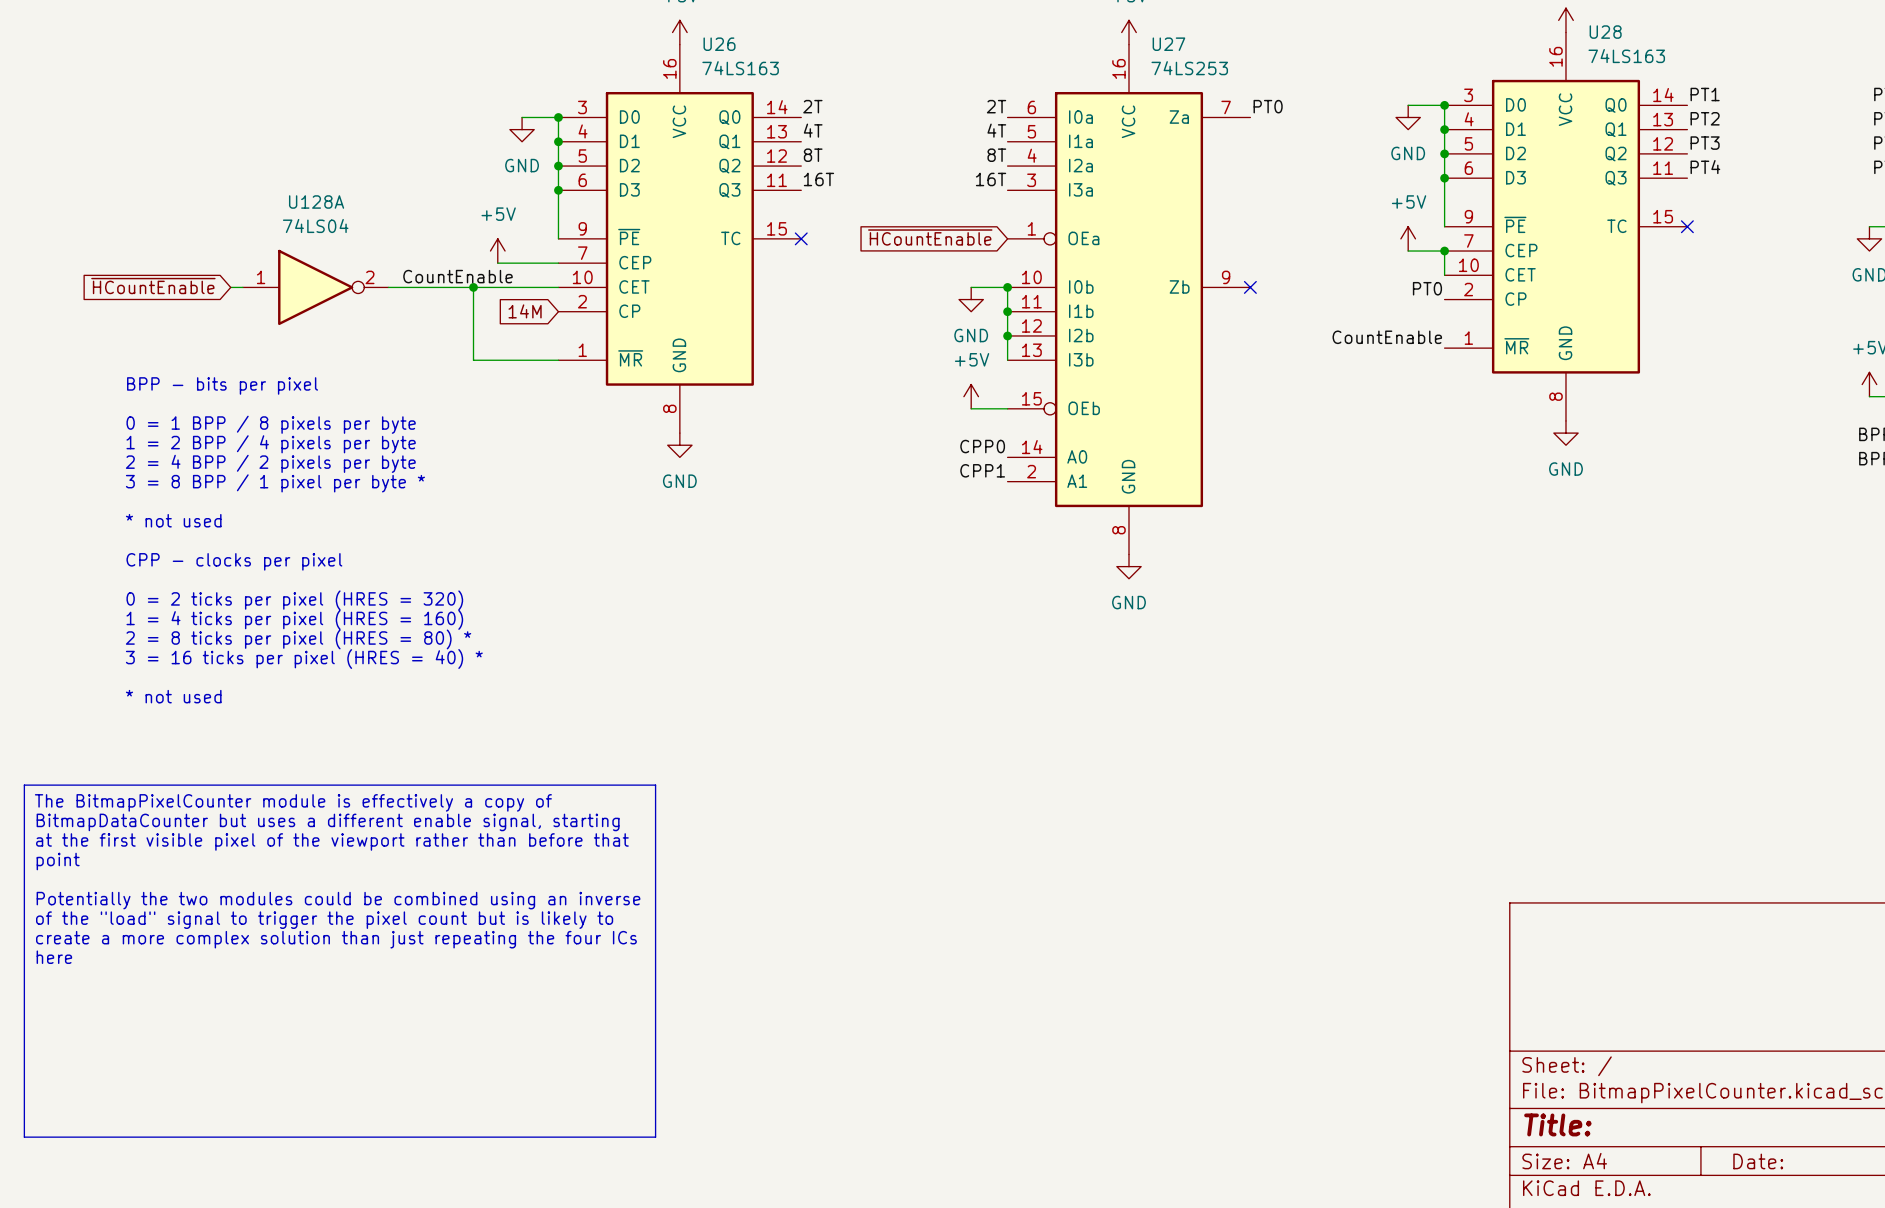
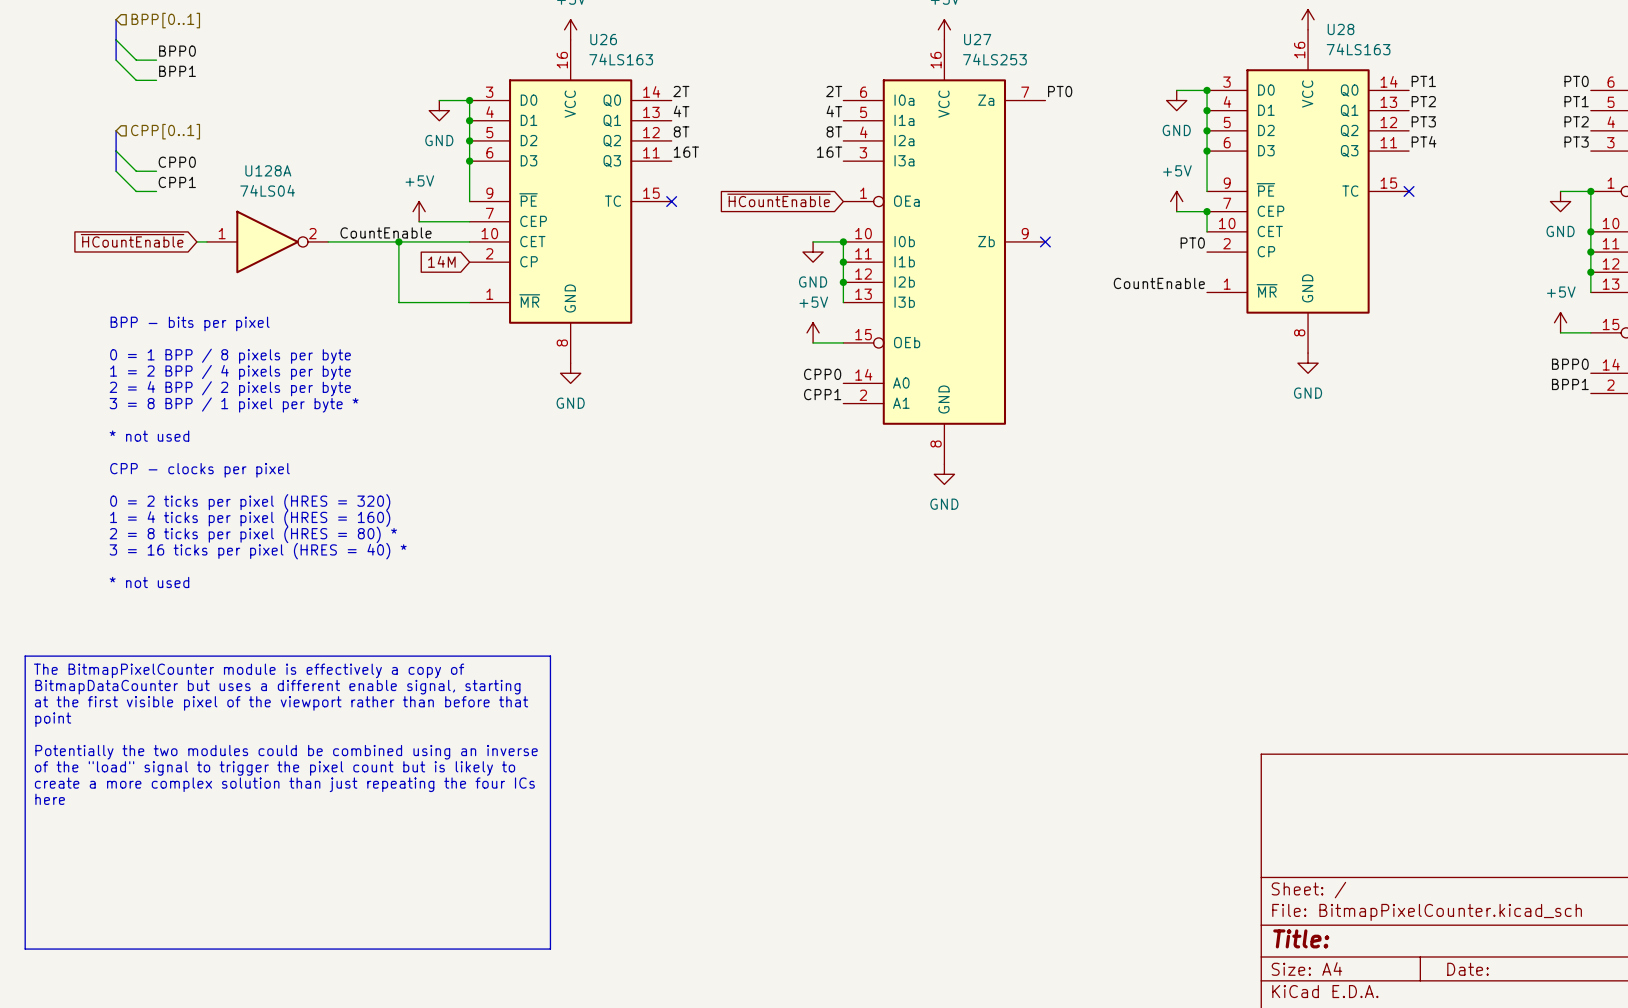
bus: none -> (116, 19) (116, 60)
hierarchical label: none -> BPP[0..1] (165, 20)
wire: none -> (116, 39) (136, 60) (156, 60)
label: none -> BPP0 (177, 51)
wire: none -> (116, 60) (136, 80) (156, 80)
label: none -> BPP1 (177, 71)
bus: none -> (116, 130) (116, 171)
hierarchical label: none -> CPP[0..1] (165, 131)
wire: none -> (116, 151) (136, 171) (156, 171)
label: none -> CPP0 (177, 162)
wire: none -> (116, 171) (136, 191) (156, 191)
label: none -> CPP1 (177, 182)

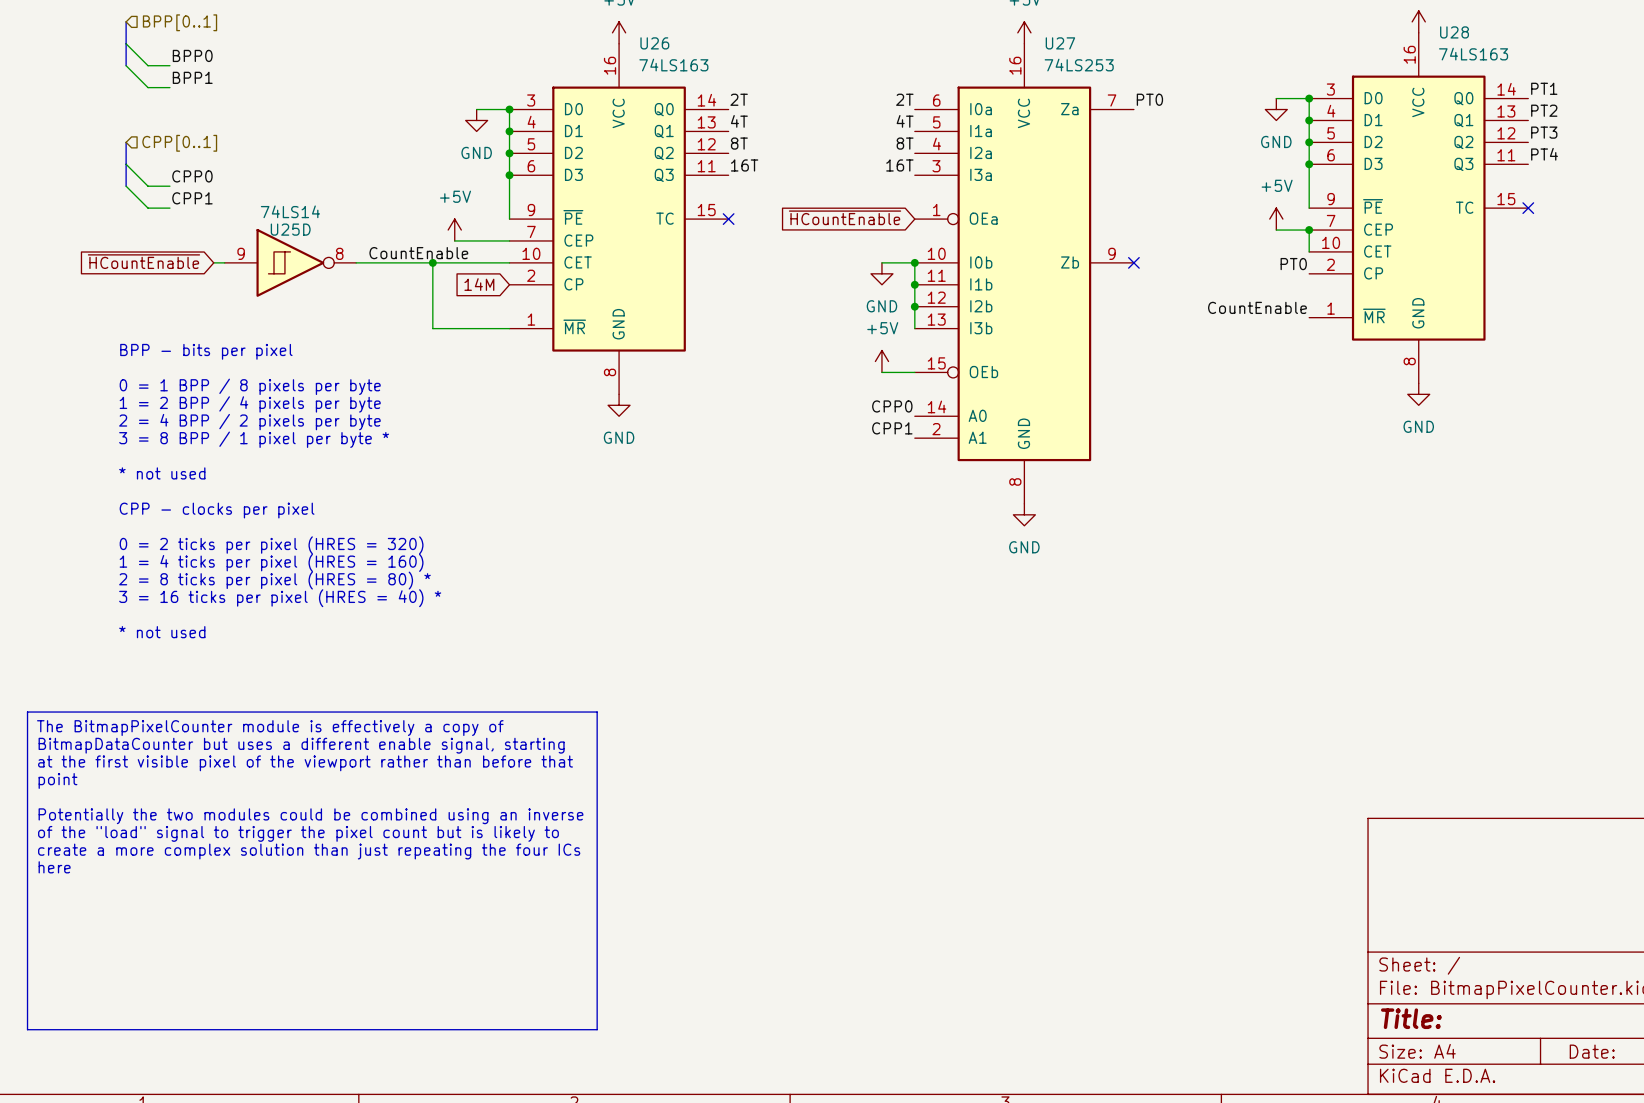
U128A: 74LS04 (267, 241) -> none
U25D: none -> 74LS14 (290, 262)

